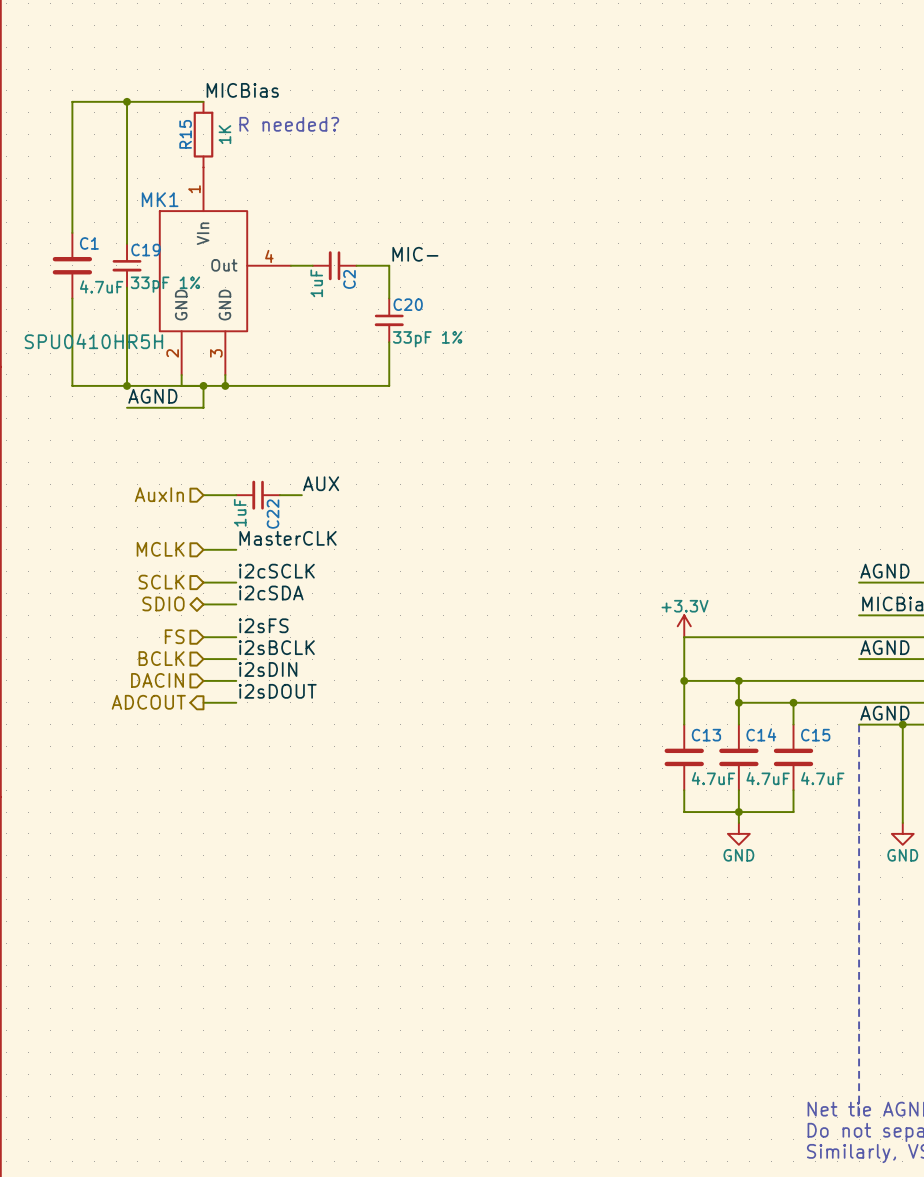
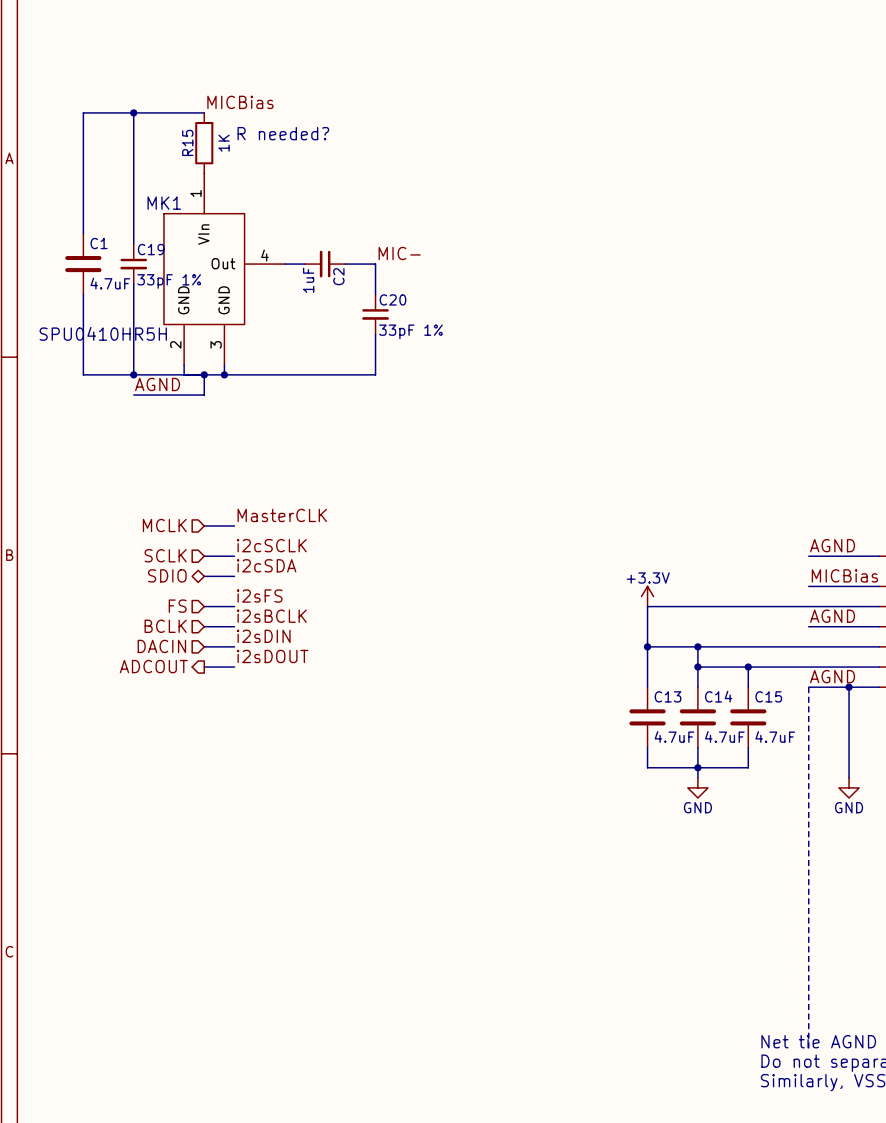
label: AUX (321, 483) -> none
hierarchical label: AuxIn (159, 494) -> none
wire: (203, 495) (236, 495) -> none
C22: 1uF (258, 495) -> none
wire: (279, 495) (301, 495) -> none

